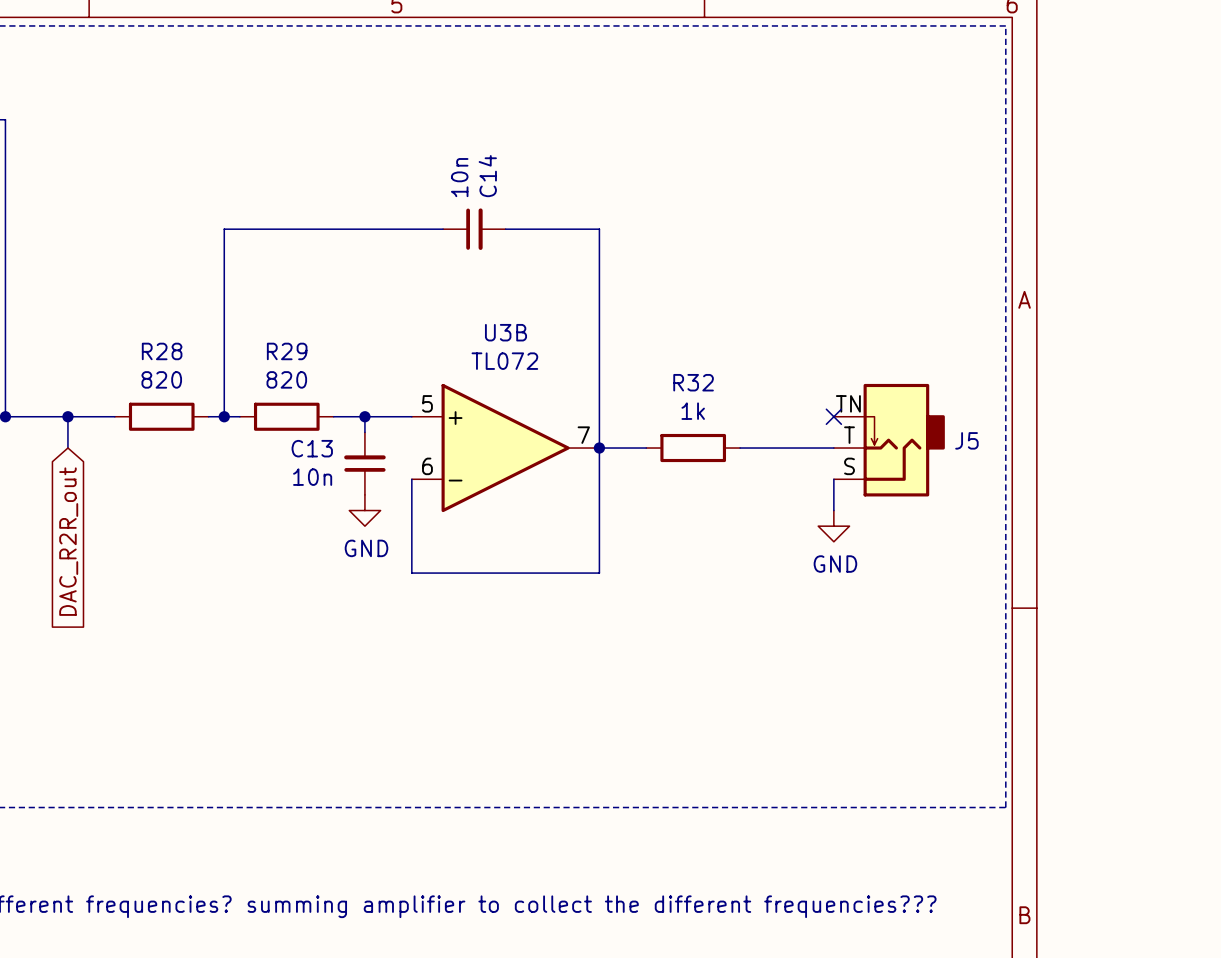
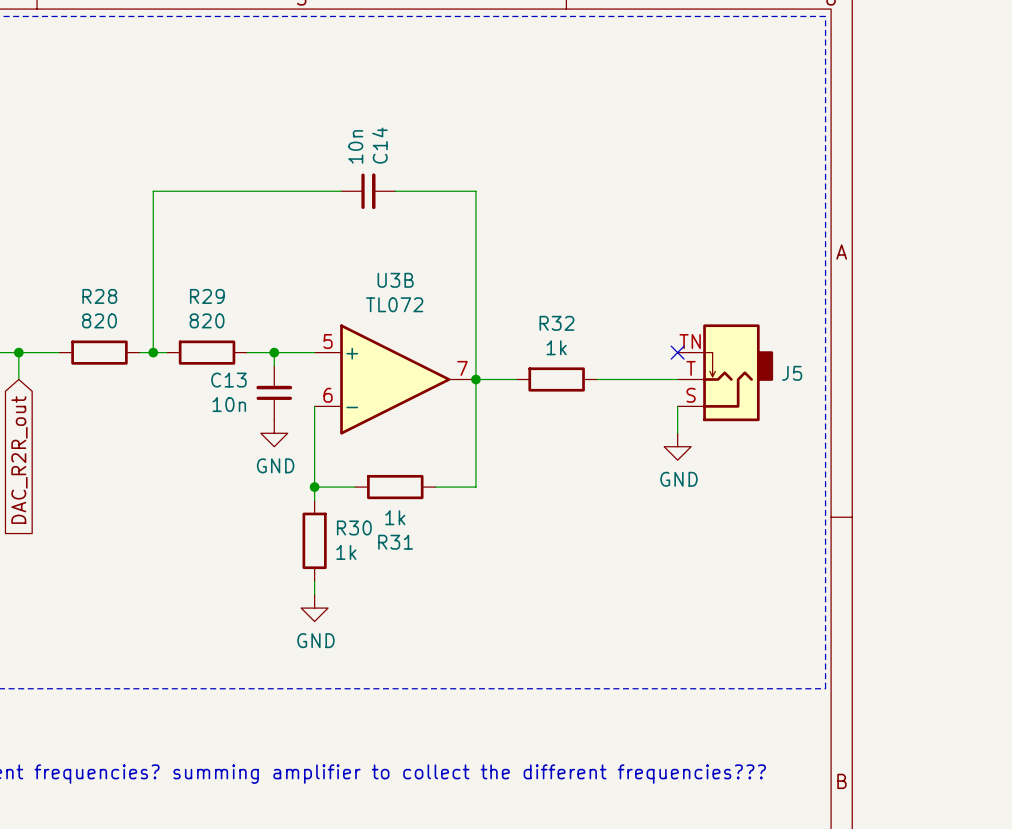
wire: none -> (314, 487) (314, 500)
junction: none -> (314, 487)
wire: (458, 573) (552, 573) -> none
R31: none -> 1k (395, 487)
R30: none -> 1k (314, 540)
wire: none -> (314, 581) (314, 594)
power symbol: none -> GND (314, 608)

